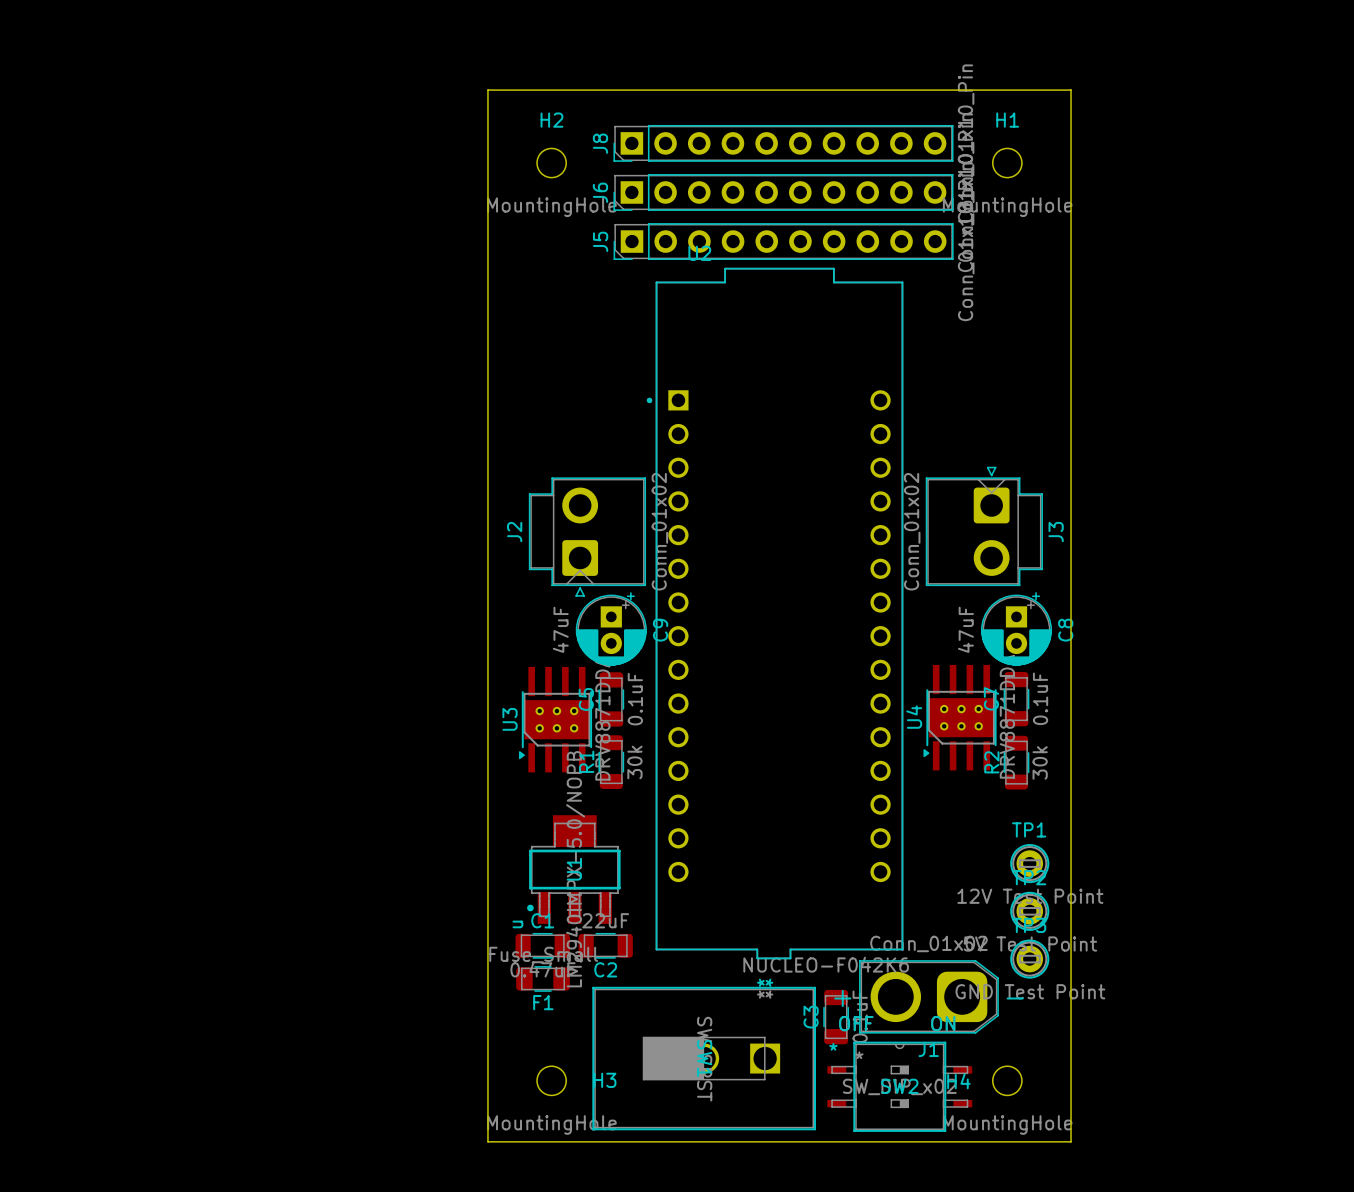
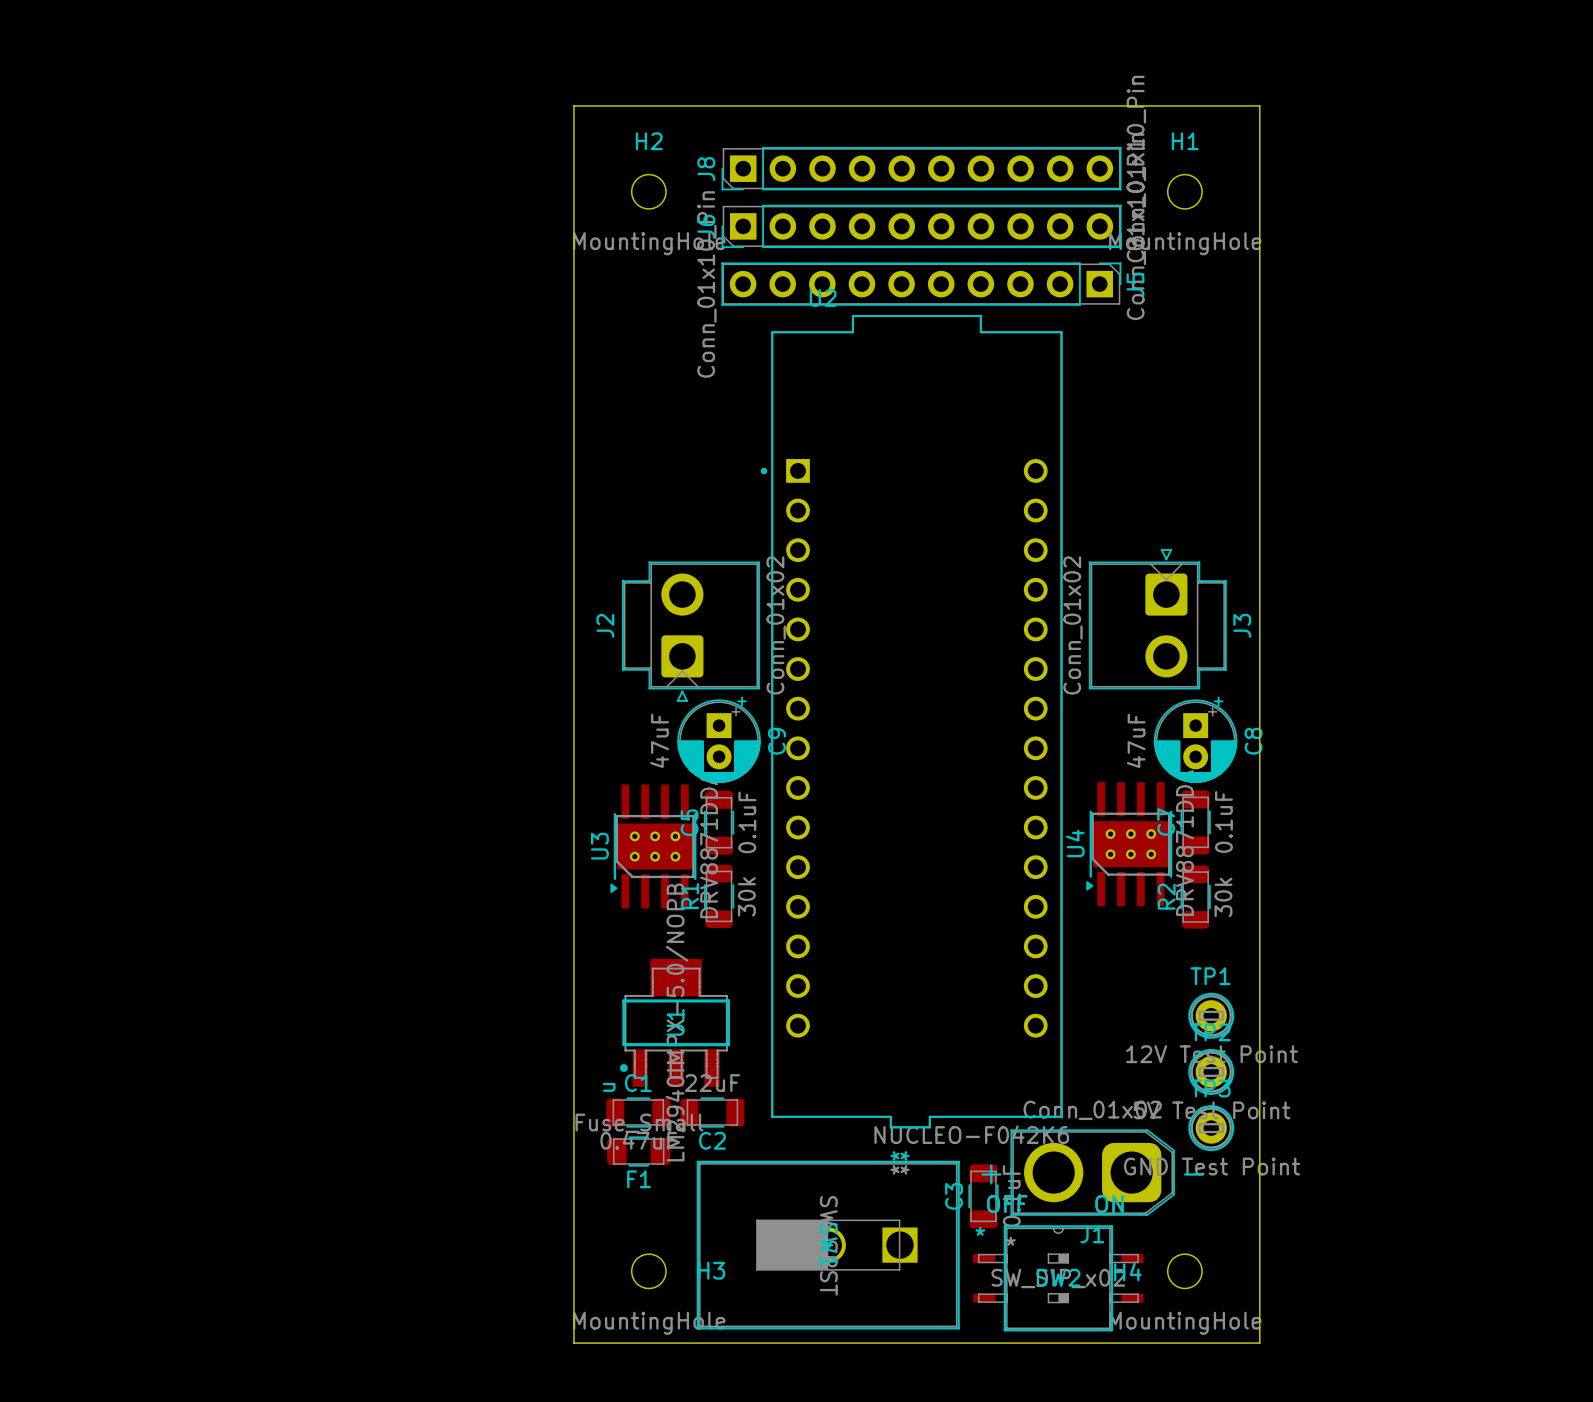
J5 rotation: 0° (783, 241) -> 180° (921, 284)

